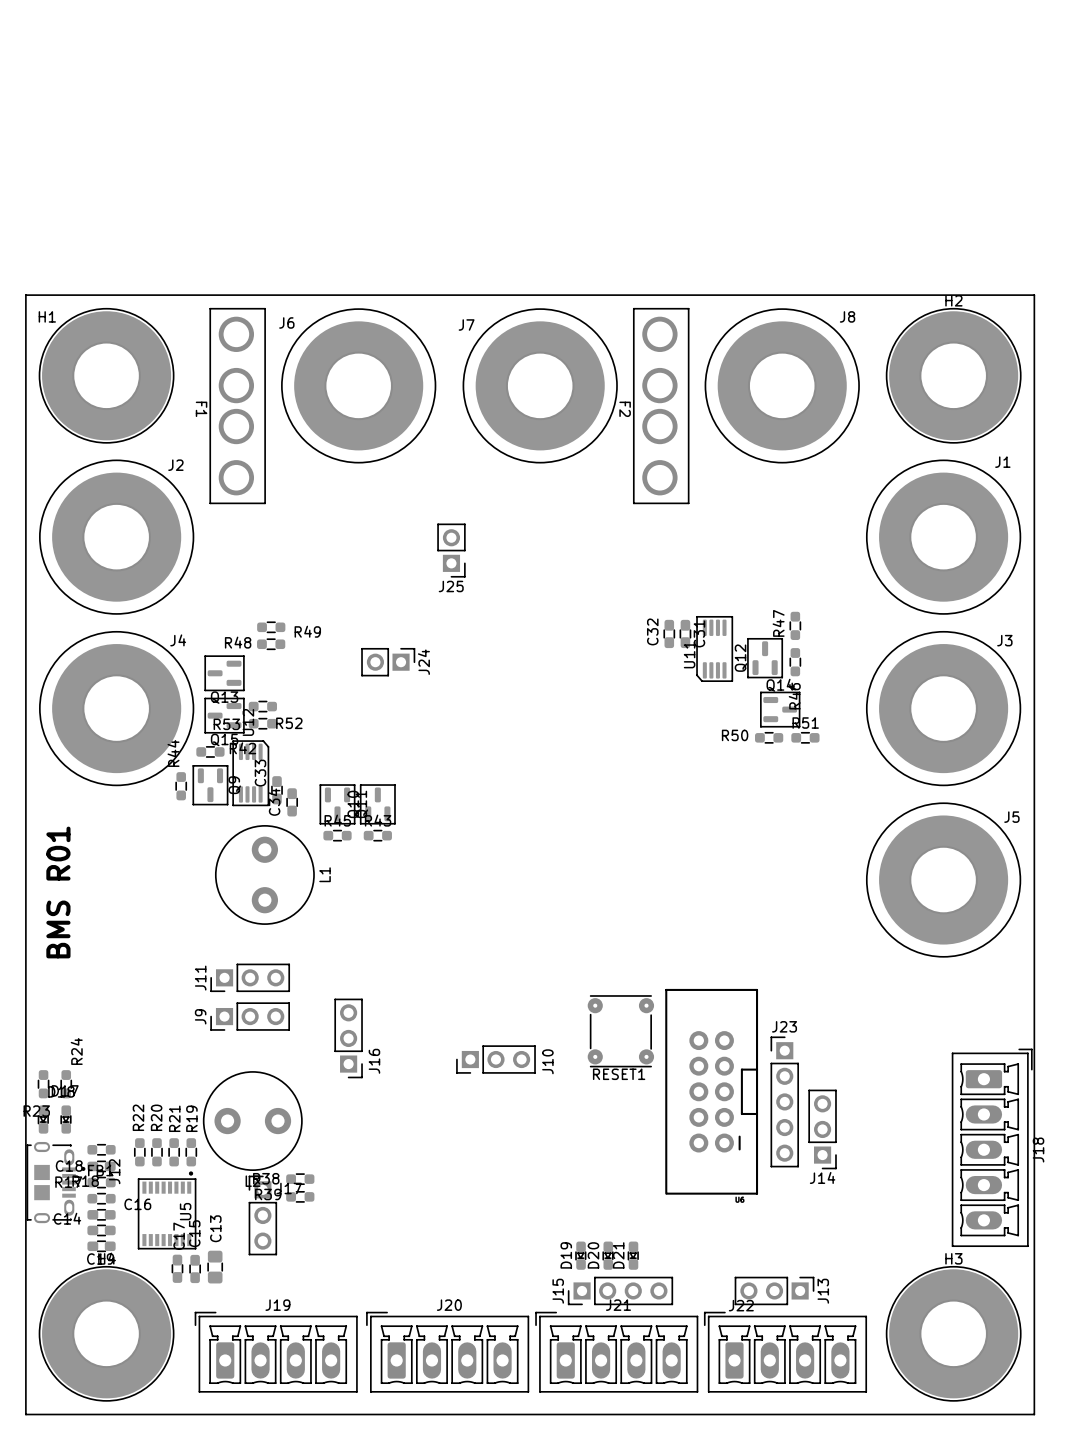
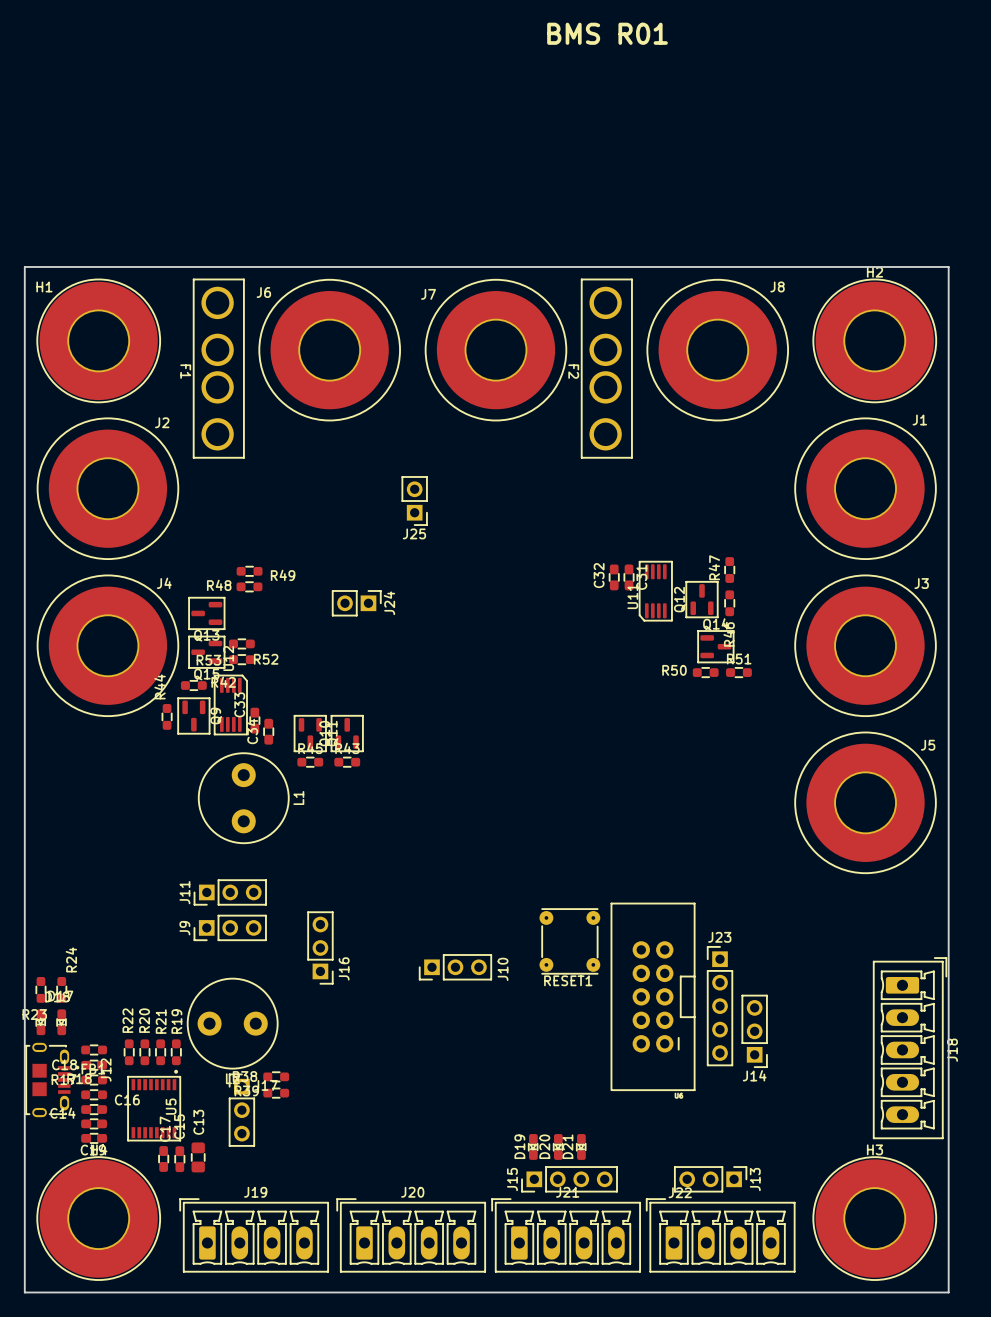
text: none -> BMS R01 (607, 33)
text: BMS R01 (58, 892) -> none

